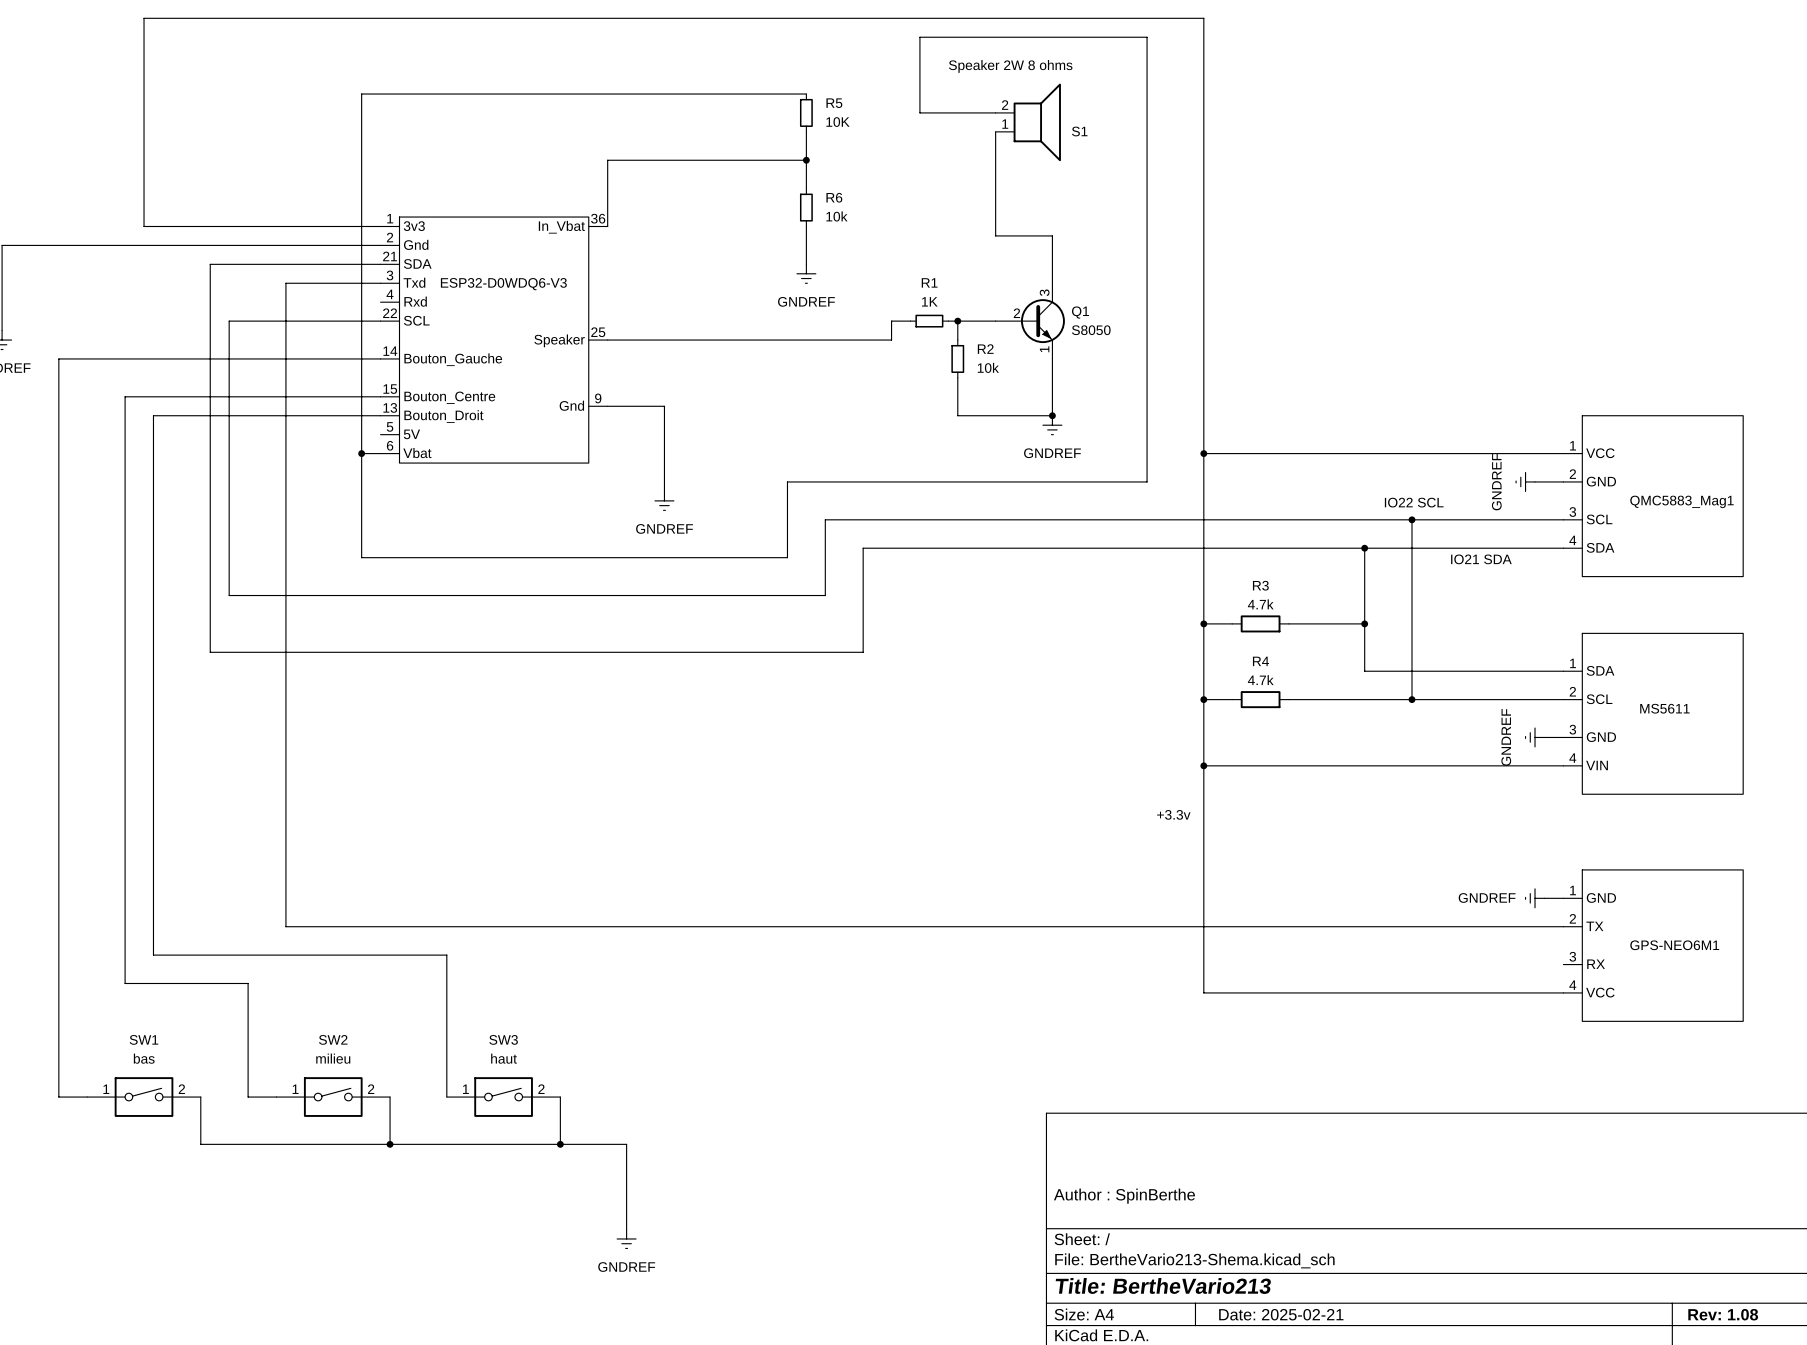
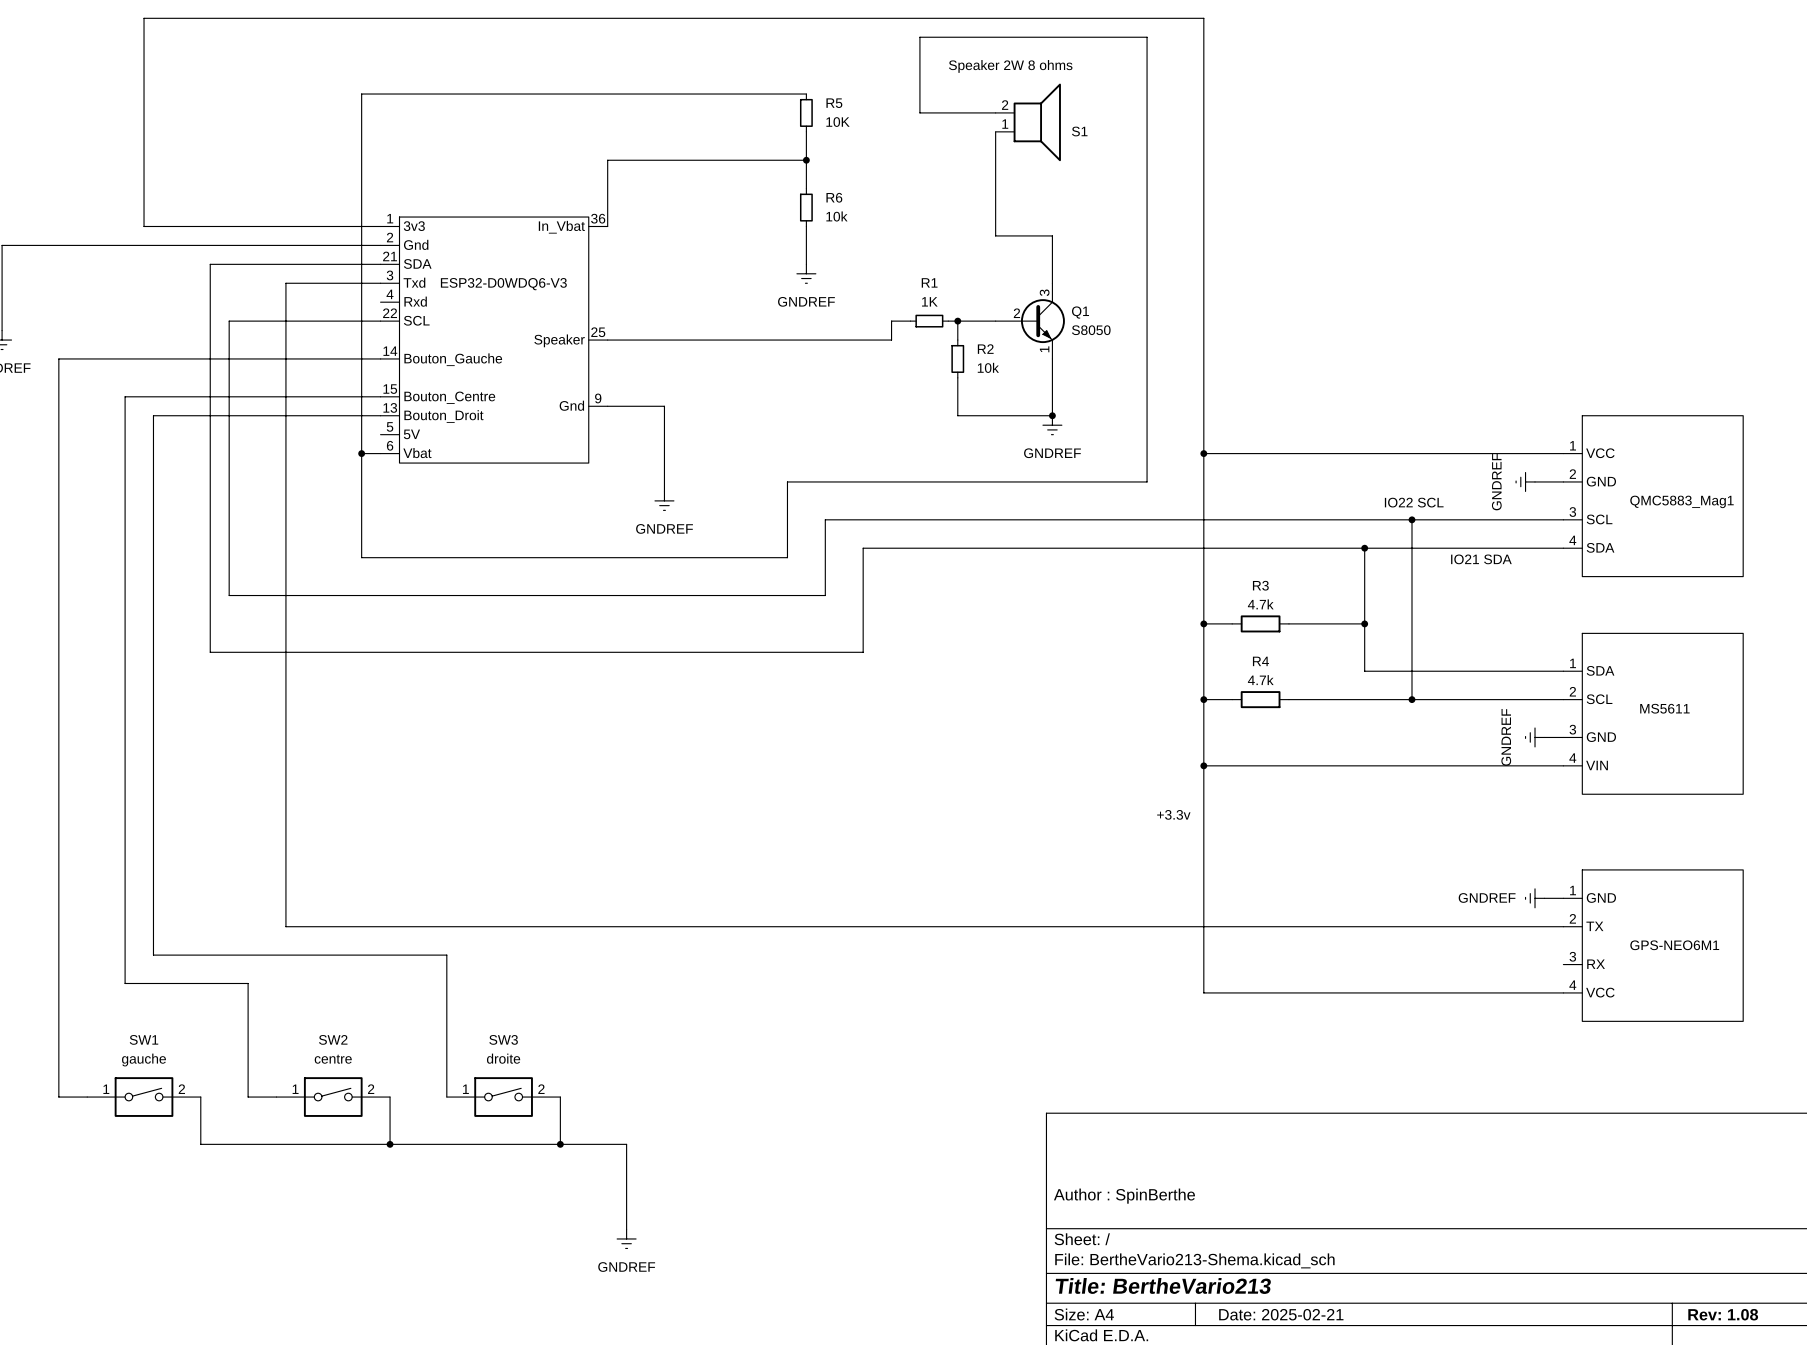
SW1 value: bas (144, 1058) -> gauche (143, 1060)
SW2 value: milieu (333, 1058) -> centre (333, 1059)
SW3 value: haut (504, 1058) -> droite (503, 1058)

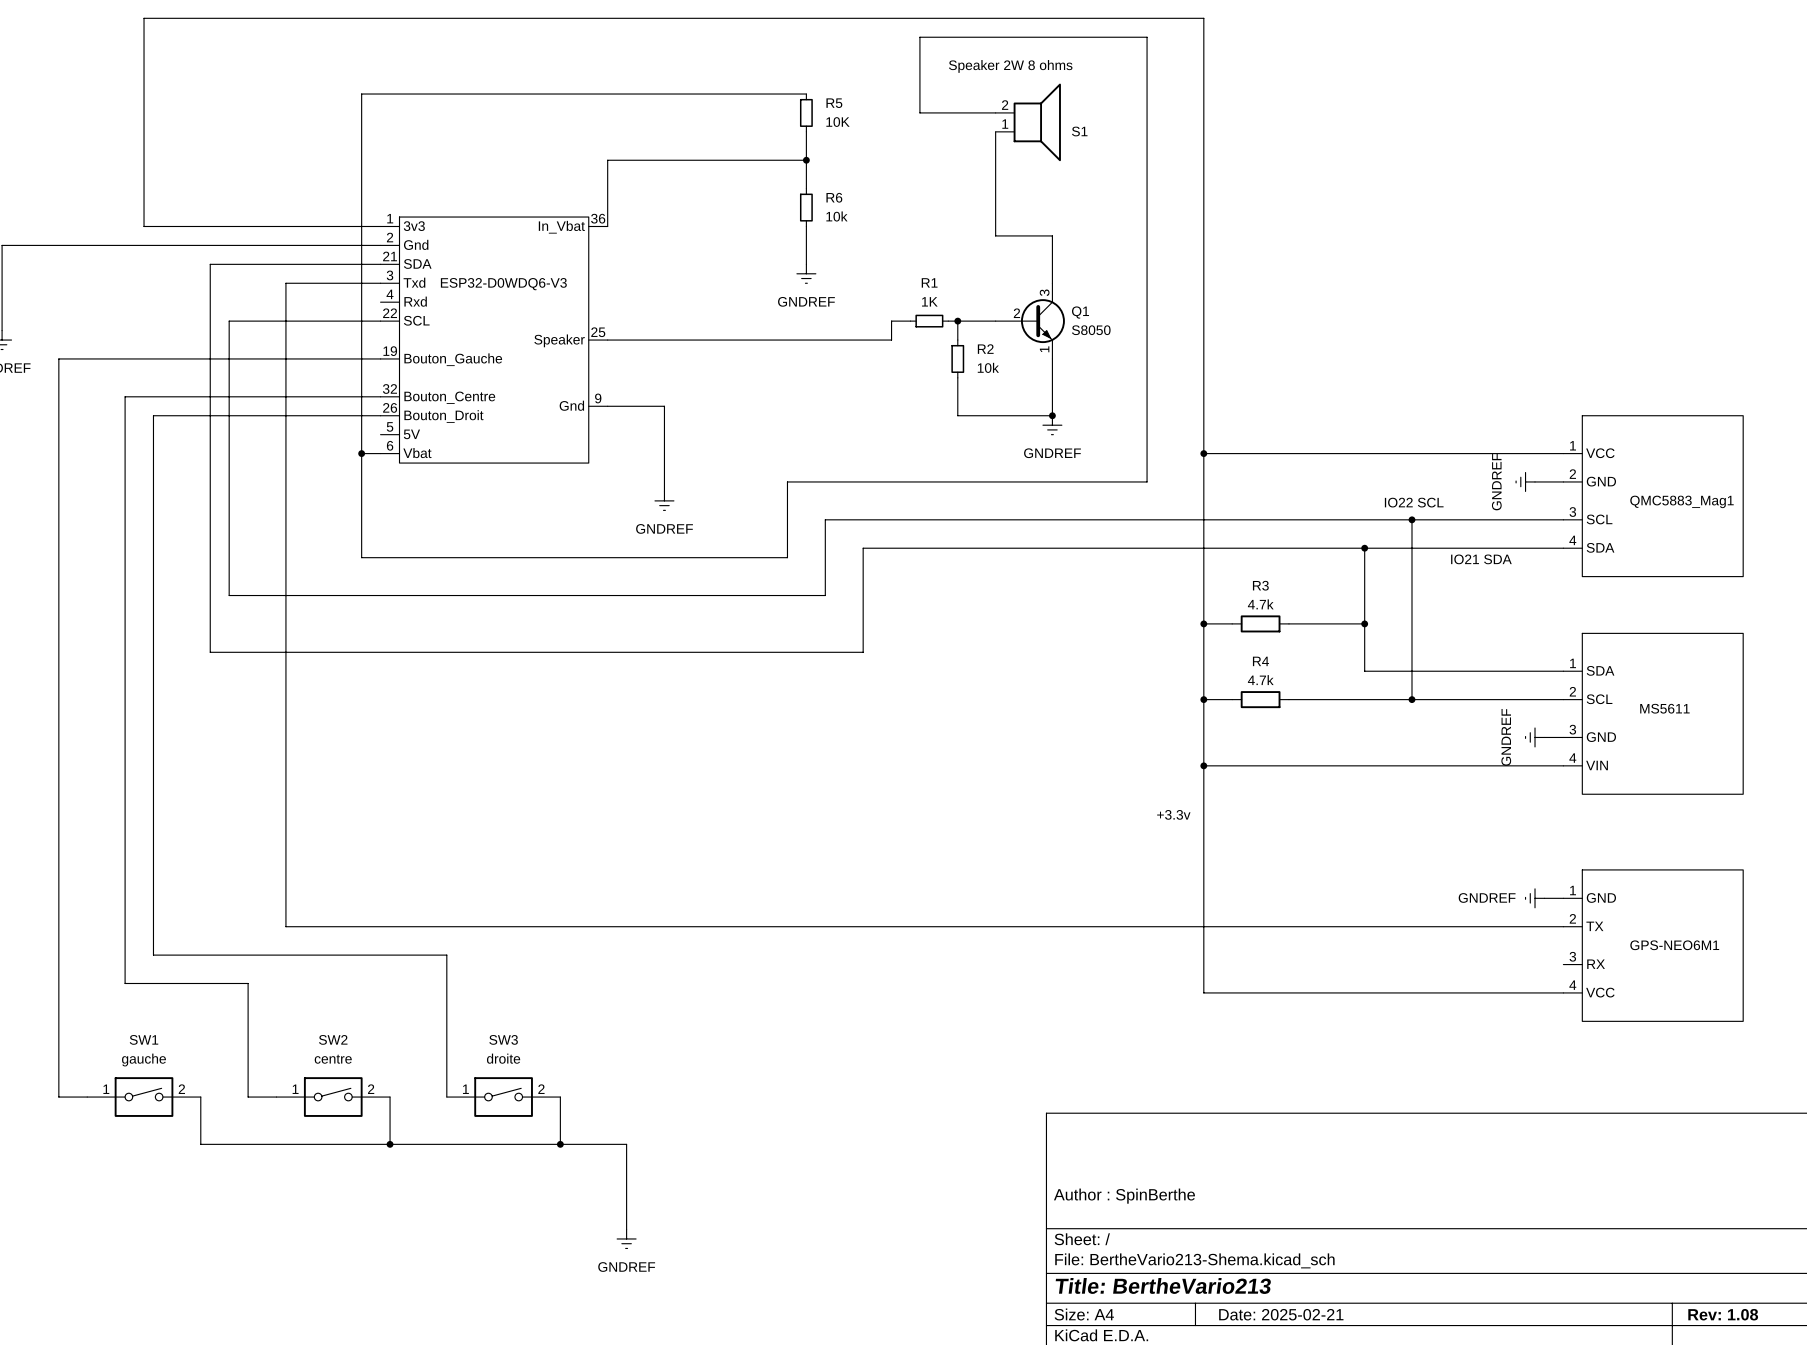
part pin number: 14 (390, 351) -> 19 (390, 351)
part pin number: 15 (390, 389) -> 32 (389, 389)
part pin number: 13 (390, 407) -> 26 (390, 407)

